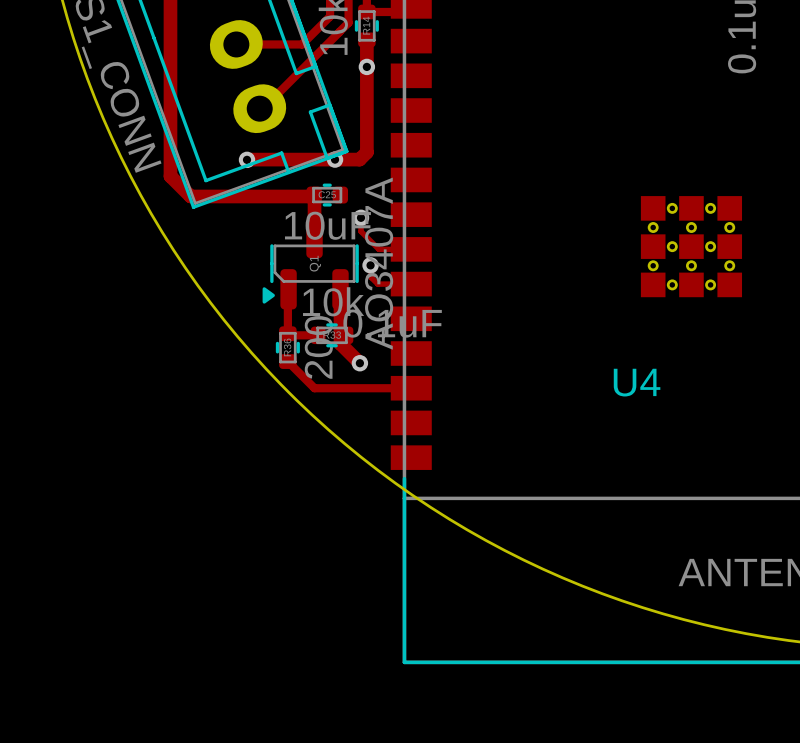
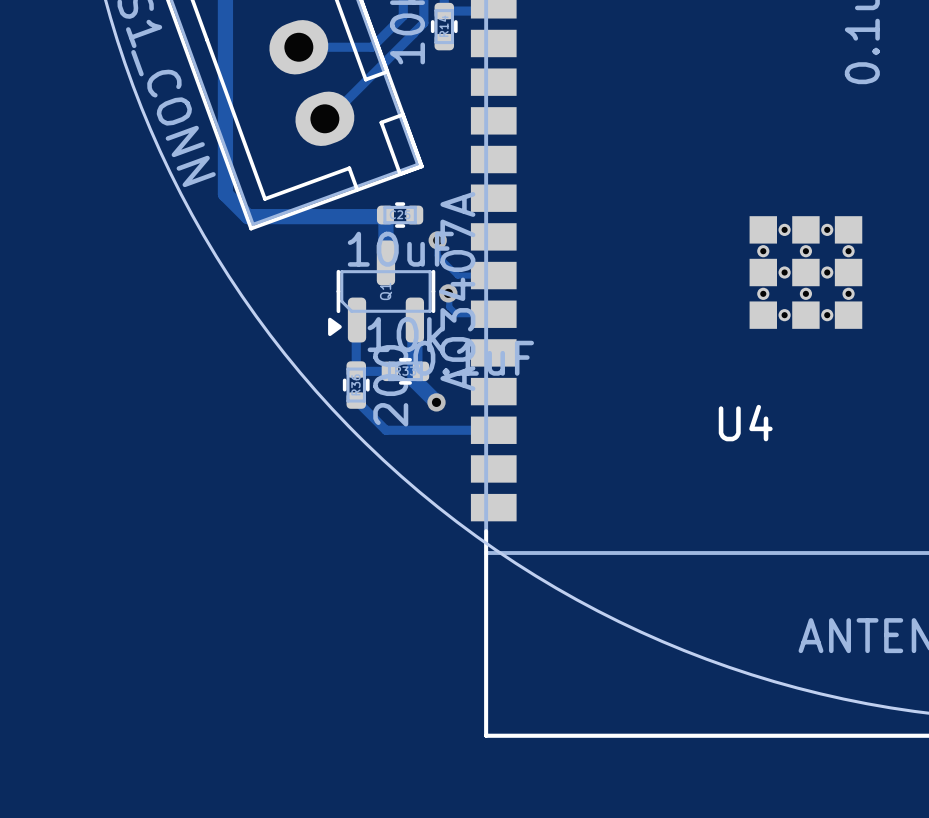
track: (366, 39) (366, 152) (359, 159) (247, 159) -> none
via: (366, 66) -> none
via: (247, 159) -> none
via: (335, 159) -> none

